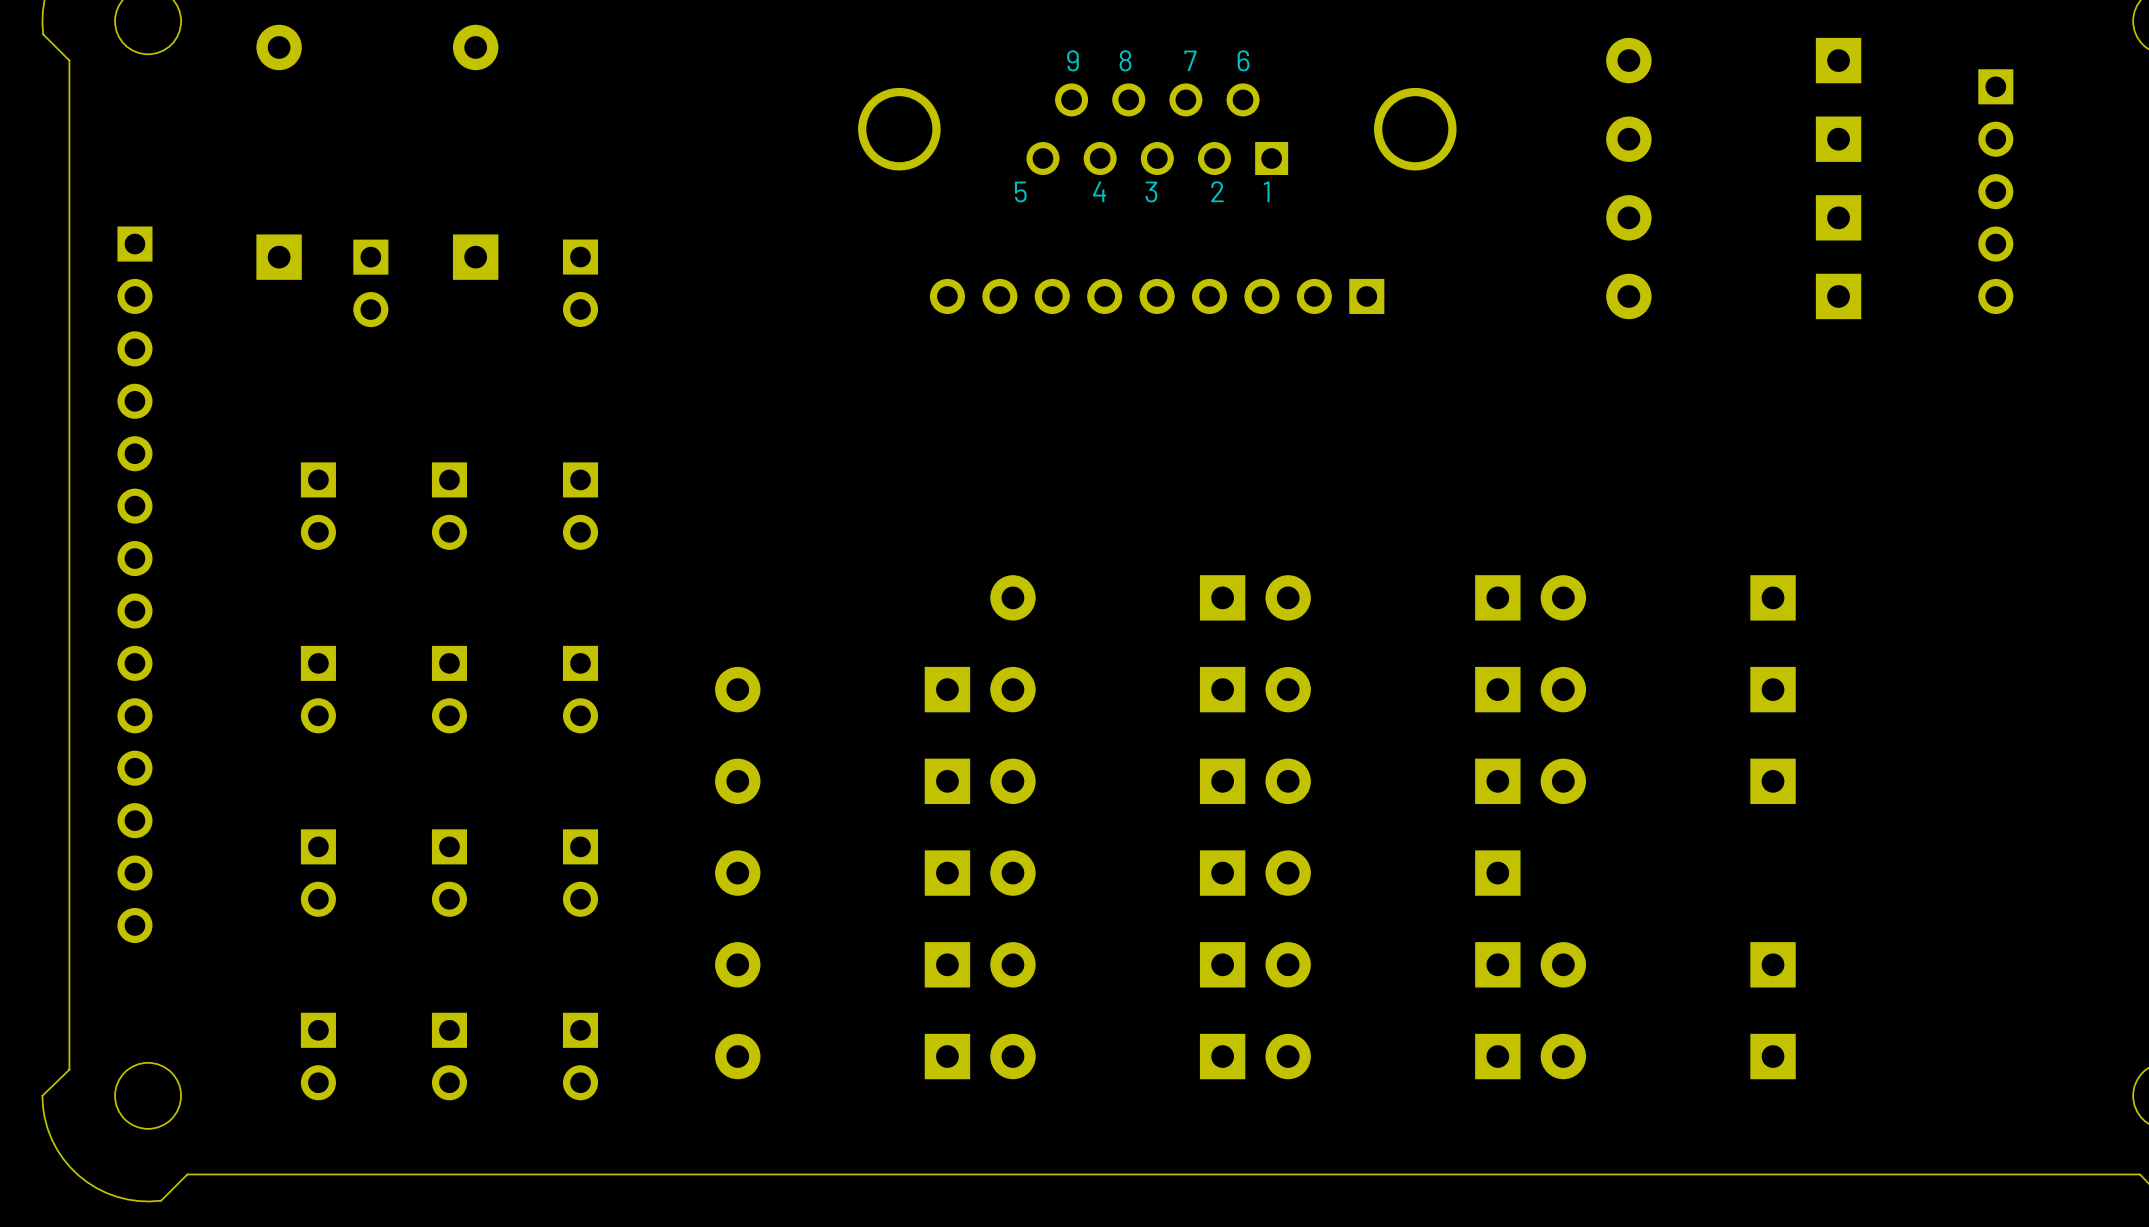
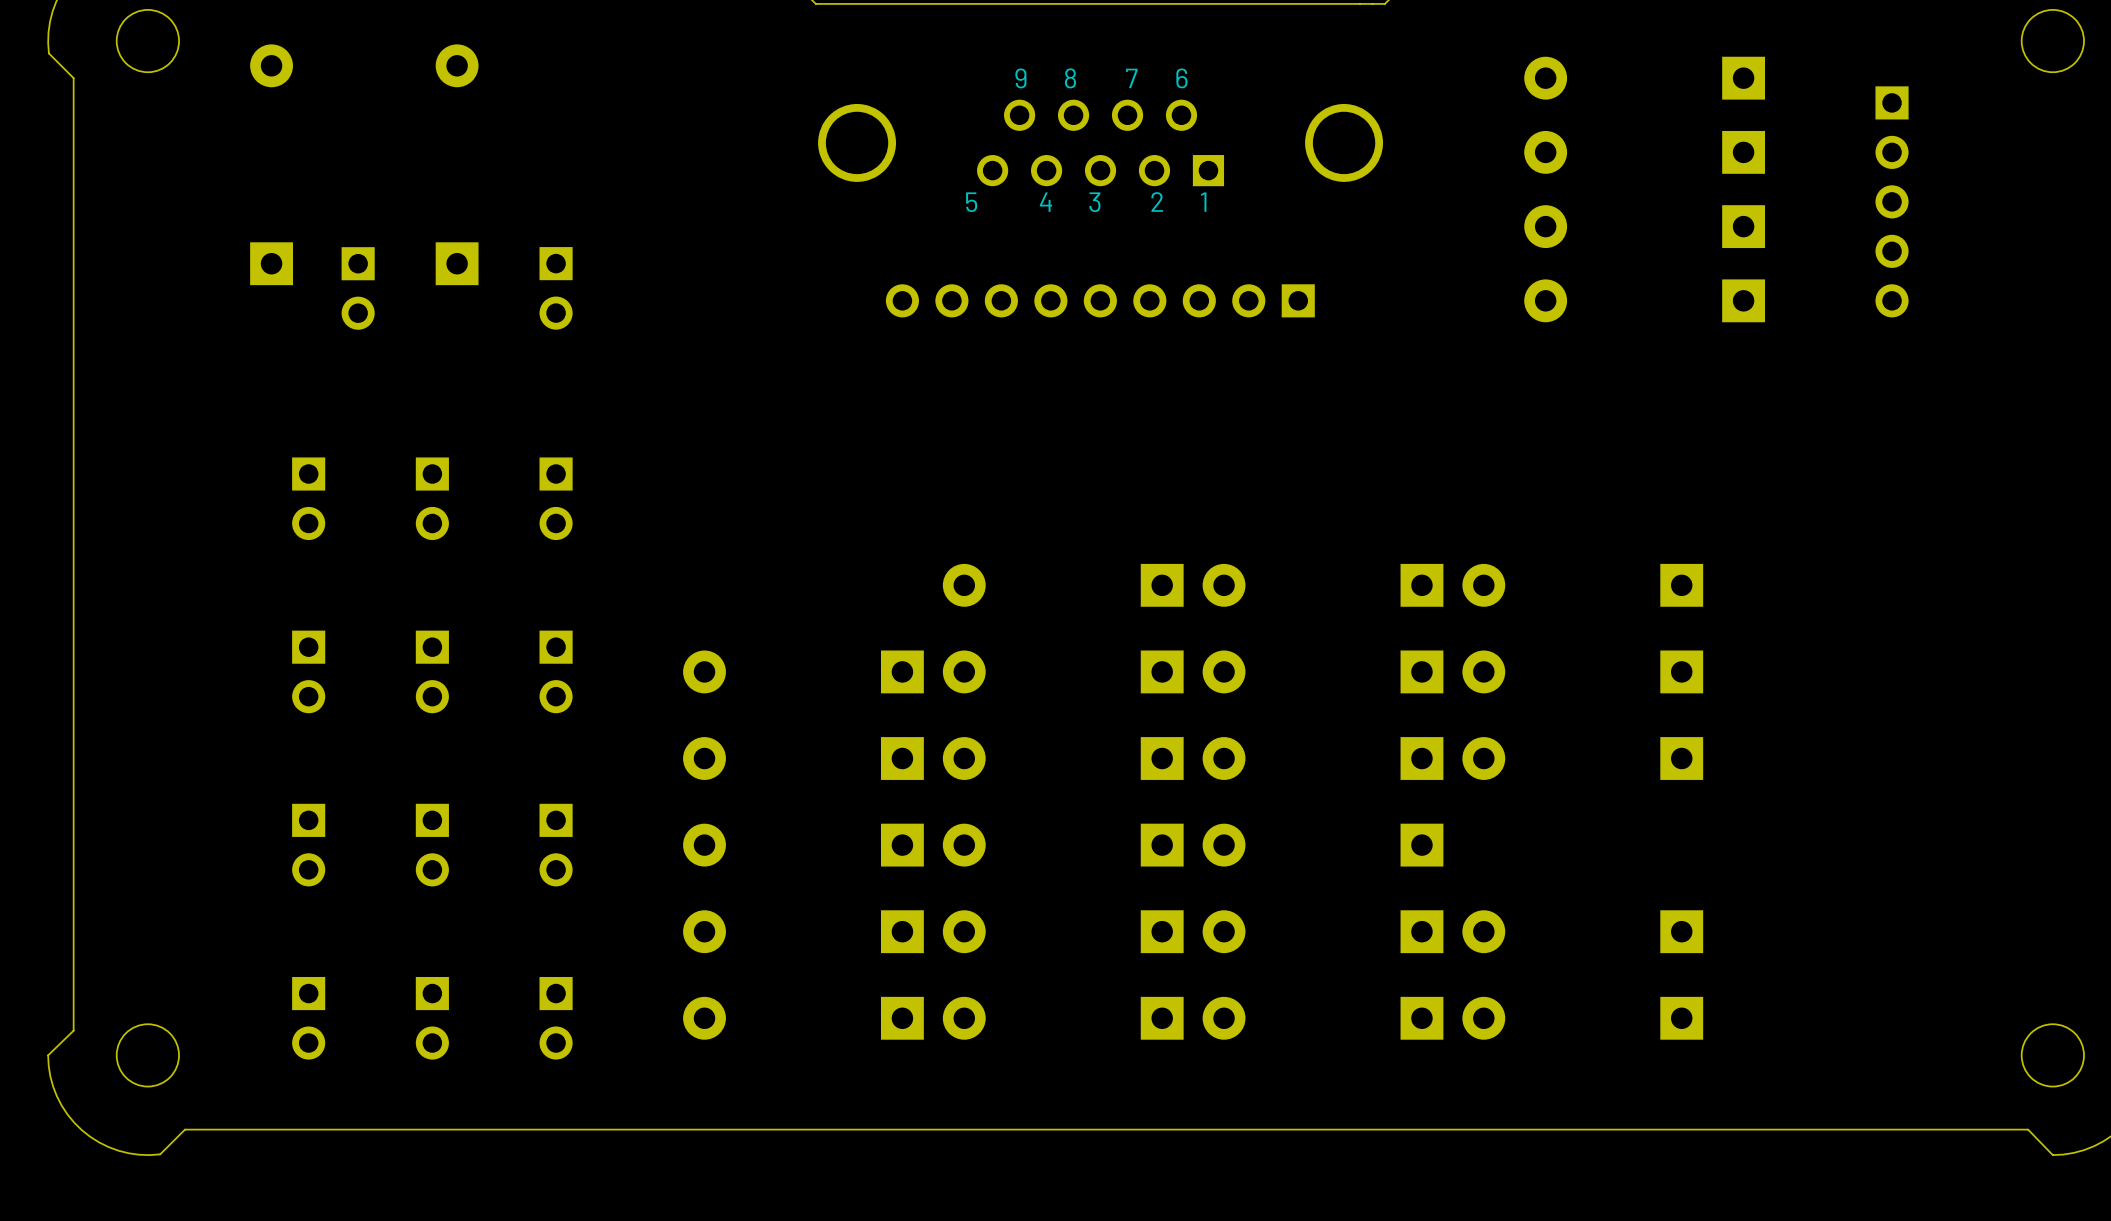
part: (134, 584) -> none

